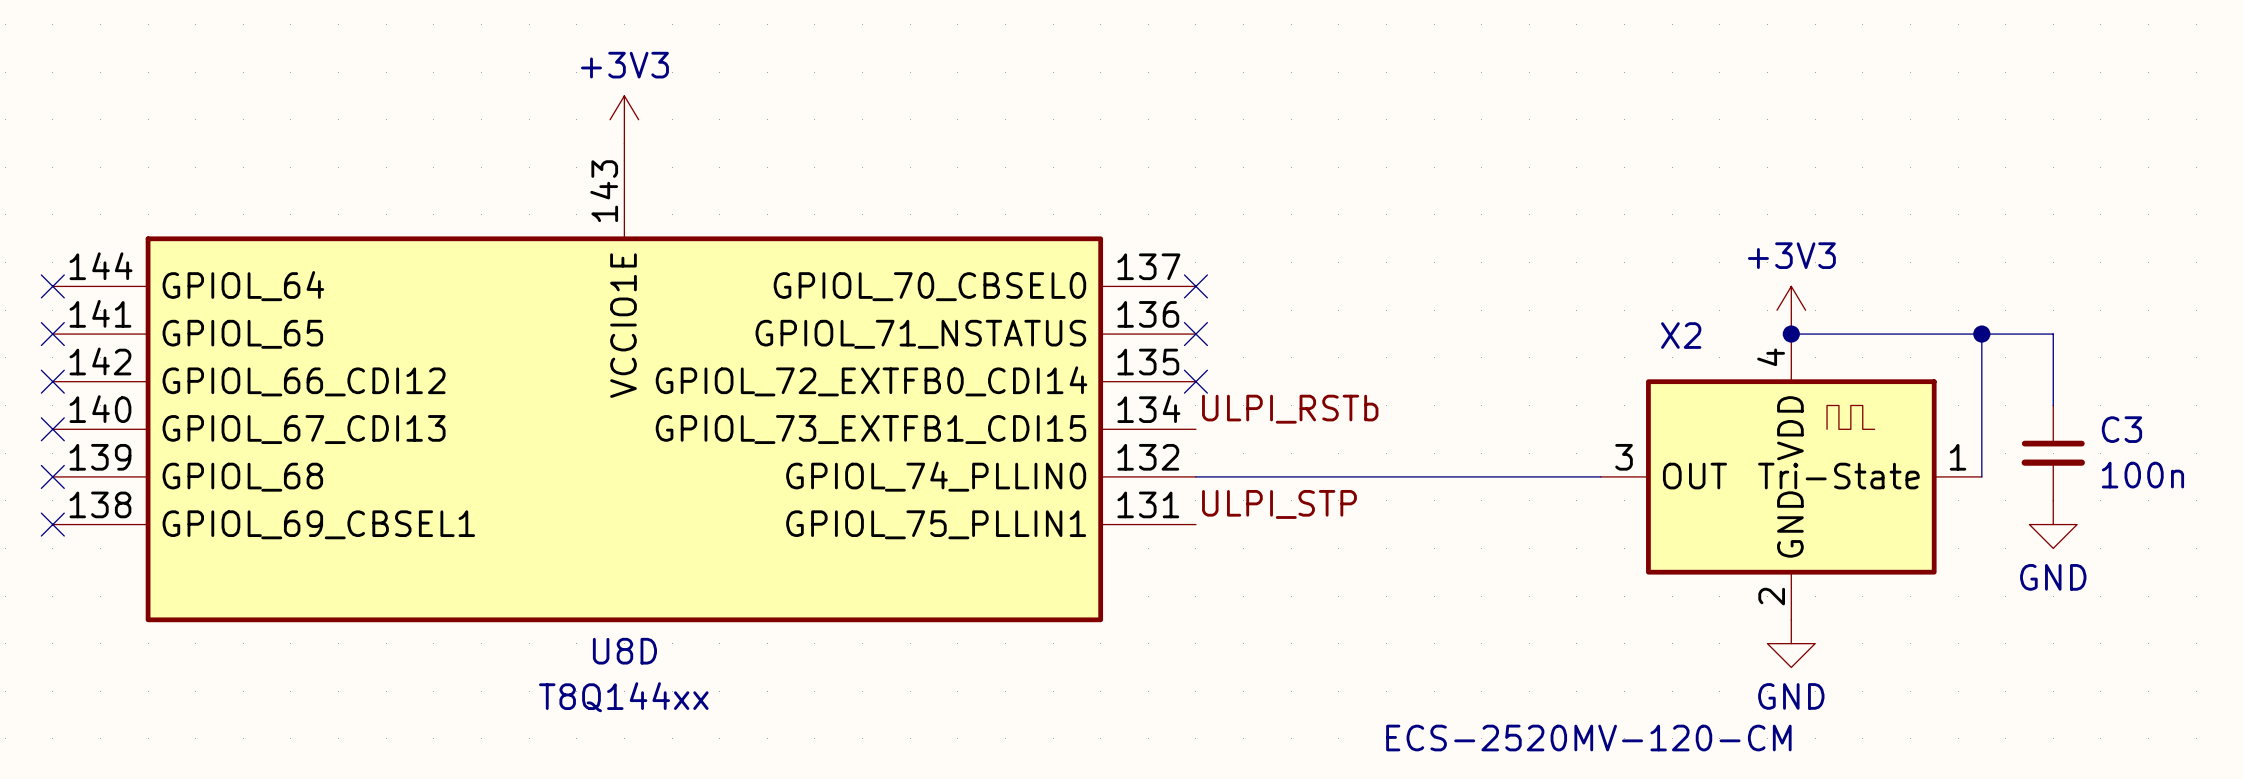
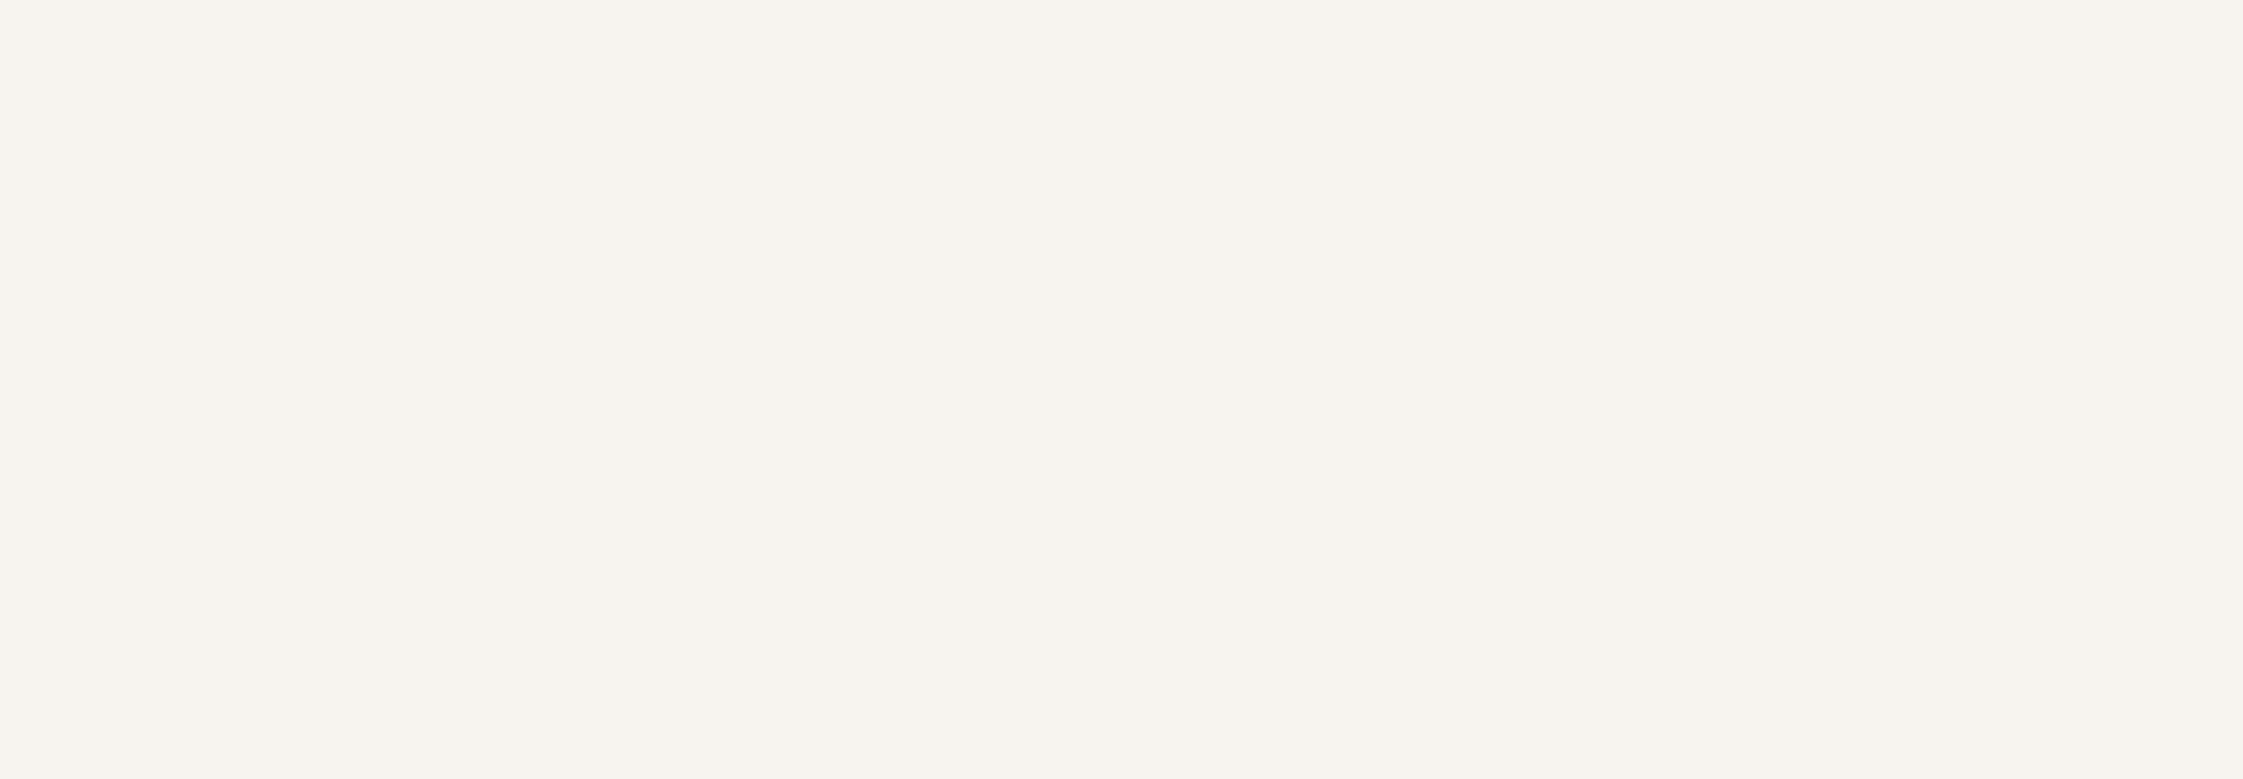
power symbol: +3V3 (624, 119) -> none
no-connect mark: (52, 286) -> none
no-connect mark: (1195, 286) -> none
power symbol: +3V3 (1791, 310) -> none
no-connect mark: (52, 334) -> none
no-connect mark: (1195, 334) -> none
wire: (1791, 334) (2053, 334) (2053, 405) -> none
junction: (1791, 334) -> none
wire: (1981, 334) (1981, 476) -> none
junction: (1981, 334) -> none
no-connect mark: (52, 381) -> none
no-connect mark: (1195, 381) -> none
U8D: T8Q144xx (624, 382) -> none
label: ULPI_RSTb (1290, 409) -> none
no-connect mark: (52, 429) -> none
C3: 100n (2053, 453) -> none
no-connect mark: (52, 476) -> none
wire: (1195, 476) (1600, 476) -> none
X2: ECS-2520MV-120-CM (1791, 476) -> none
label: ULPI_STP (1279, 504) -> none
no-connect mark: (52, 524) -> none
power symbol: GND (2053, 524) -> none
power symbol: GND (1791, 643) -> none

